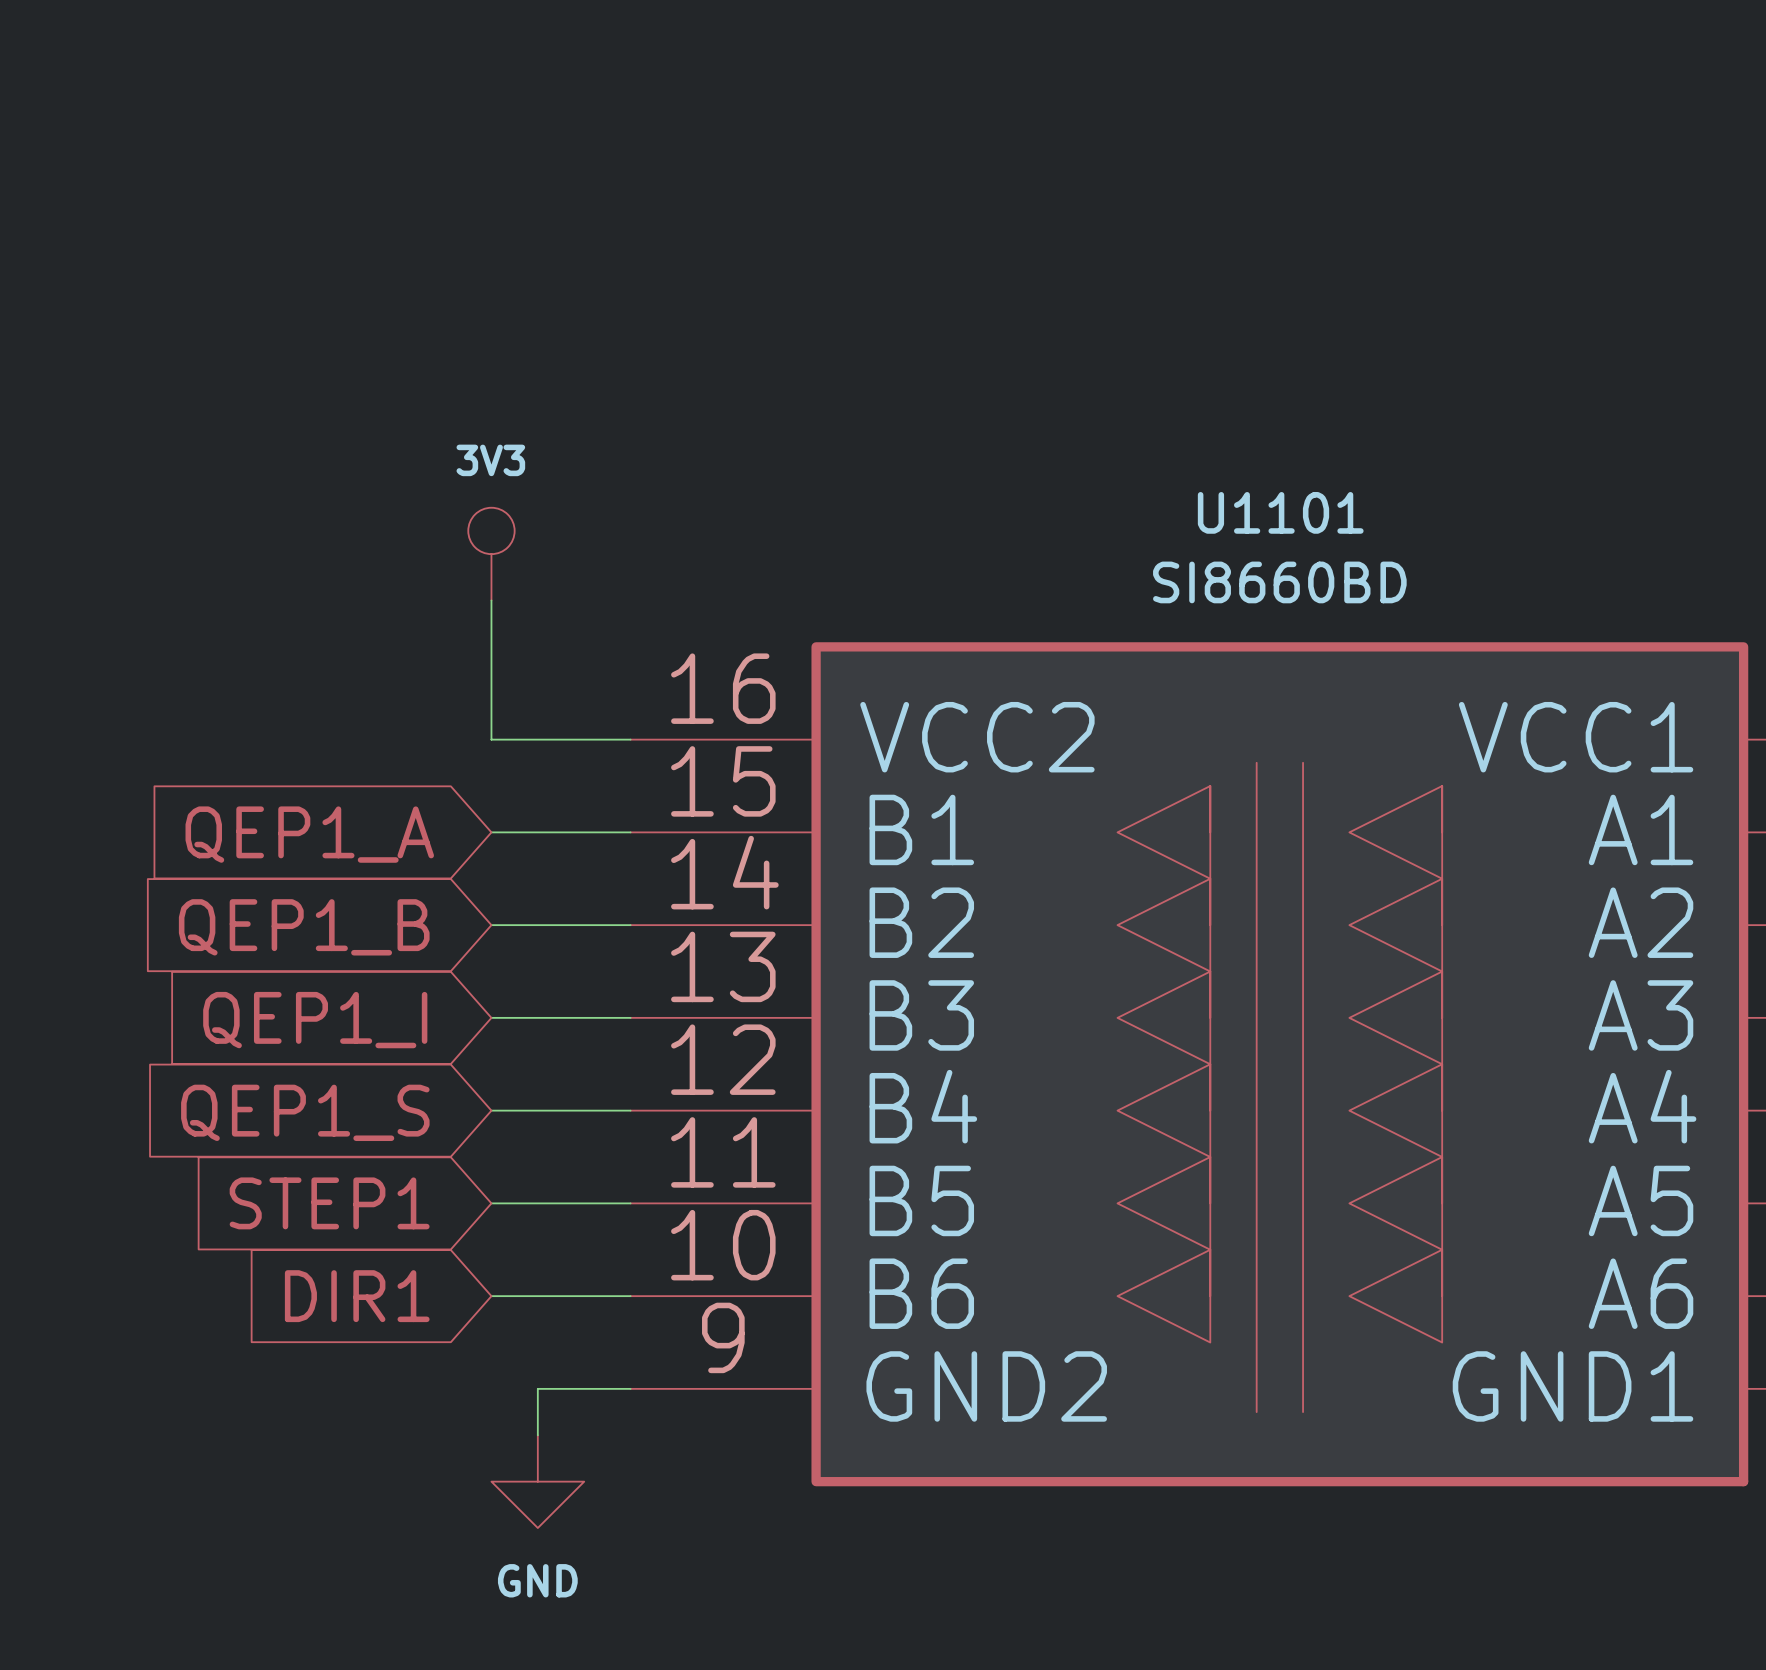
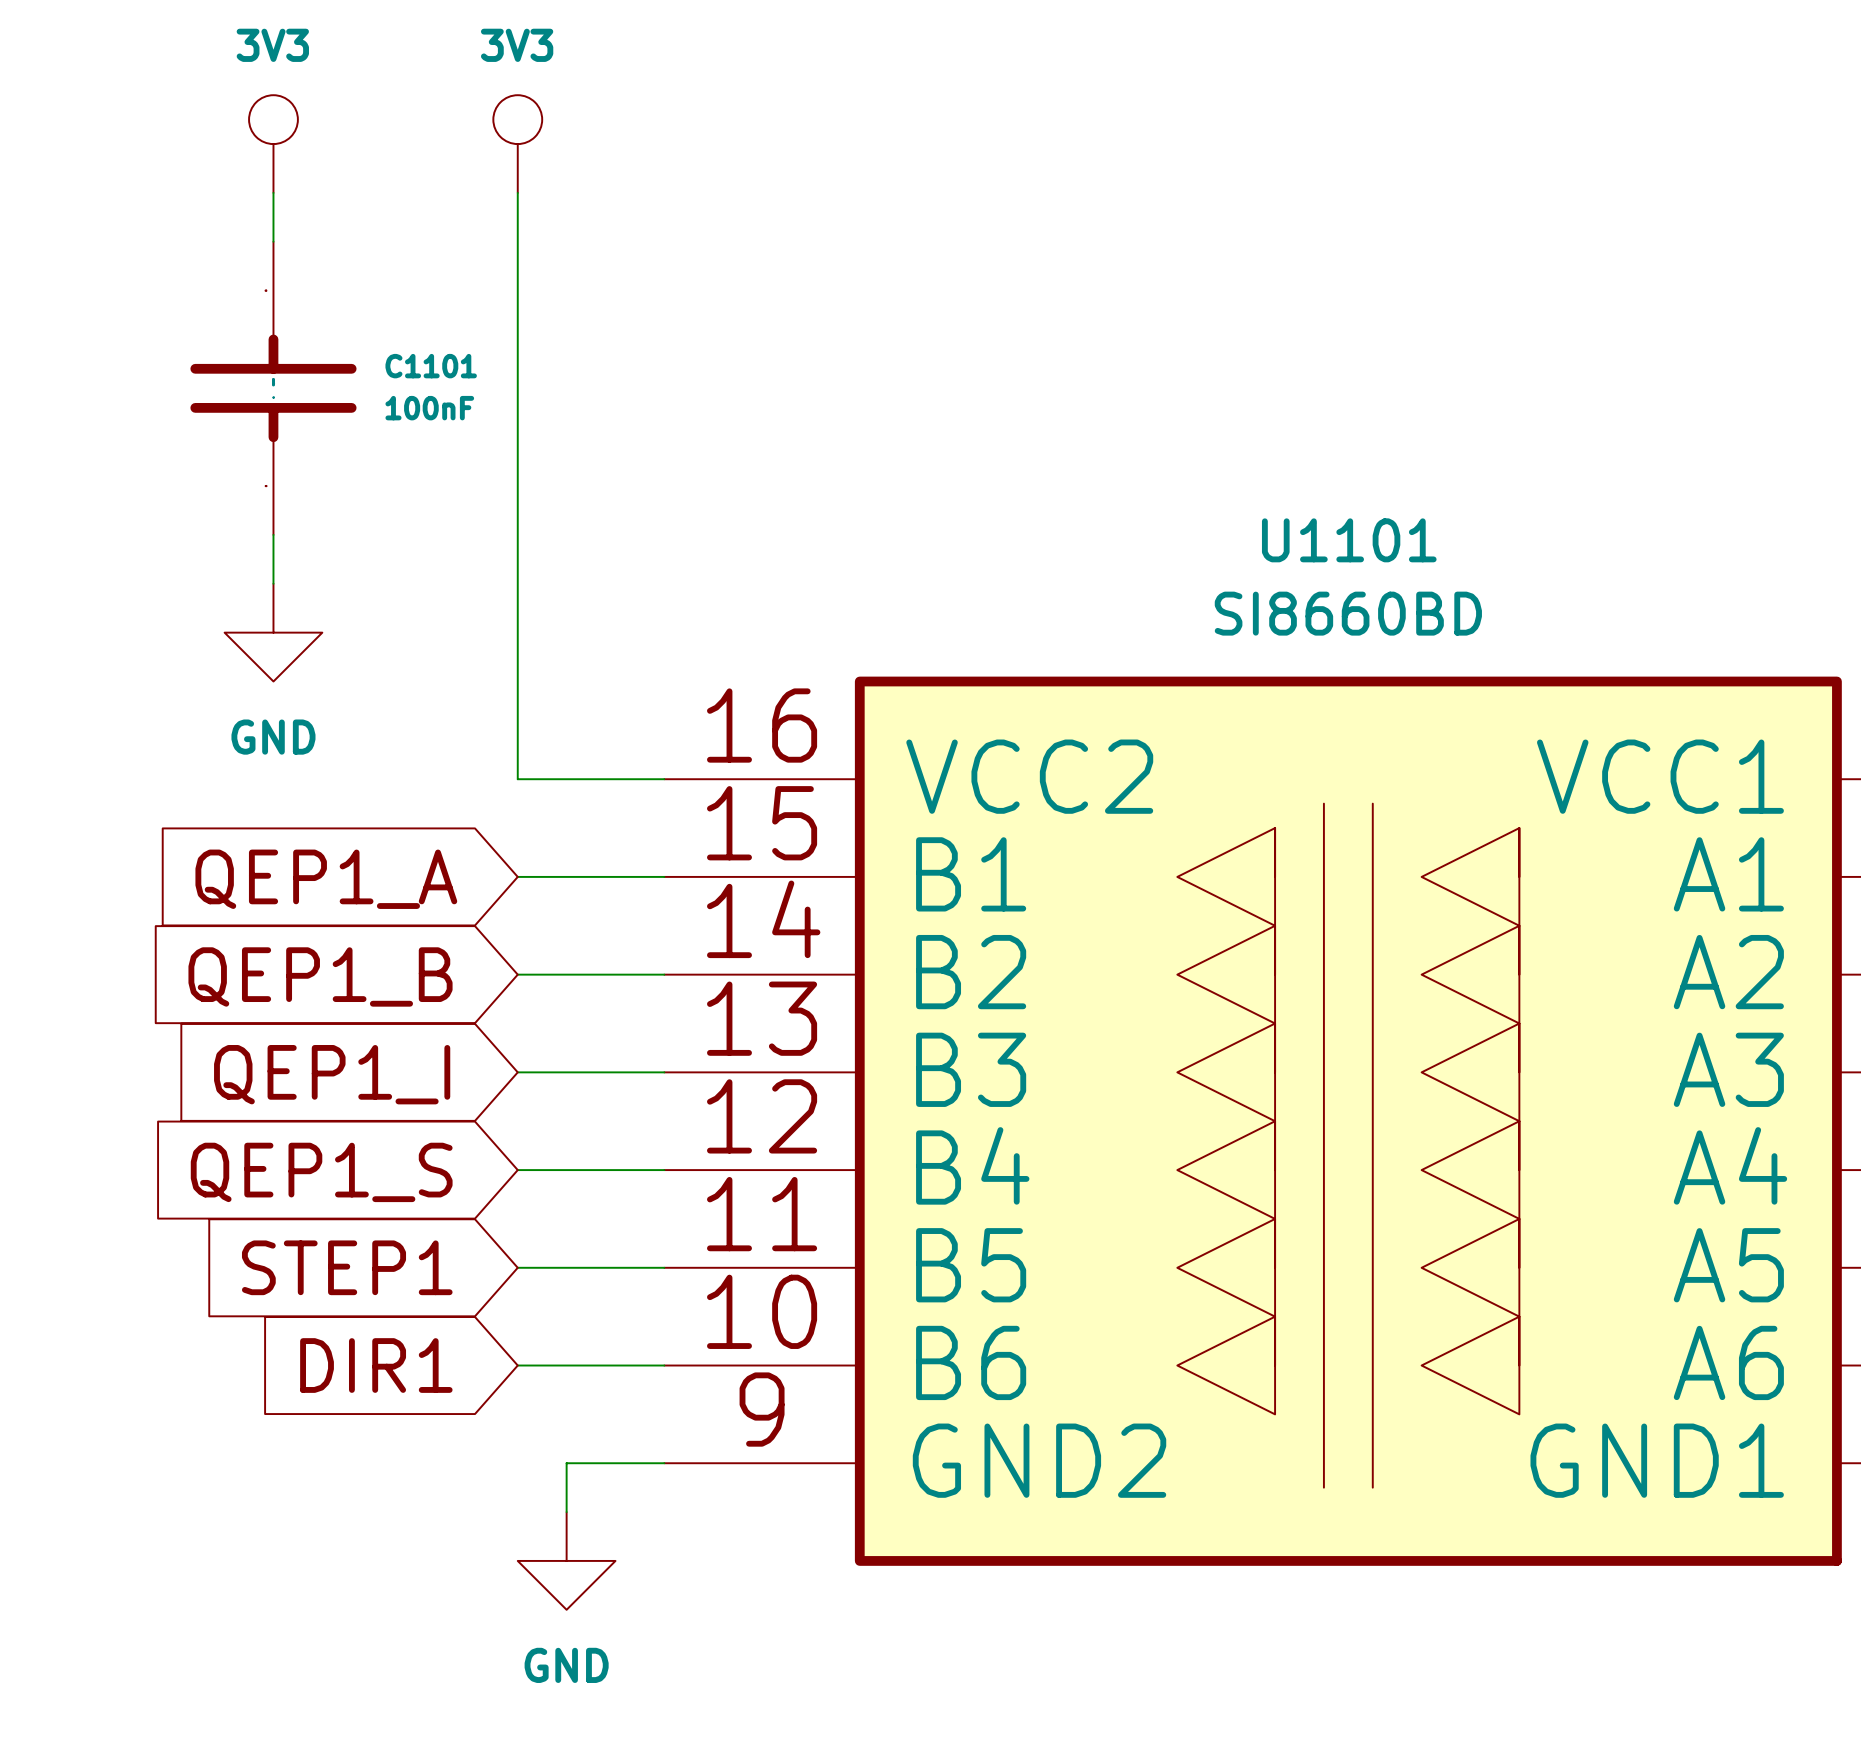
power symbol: none -> 3V3 (273, 144)
power symbol: none -> 3V3 (517, 144)
wire: none -> (273, 192) (273, 241)
wire: none -> (517, 192) (517, 632)
C1101: none -> 100nF (273, 388)
wire: none -> (273, 534) (273, 583)
power symbol: 3V3 (491, 554) -> none
power symbol: none -> GND (273, 632)

